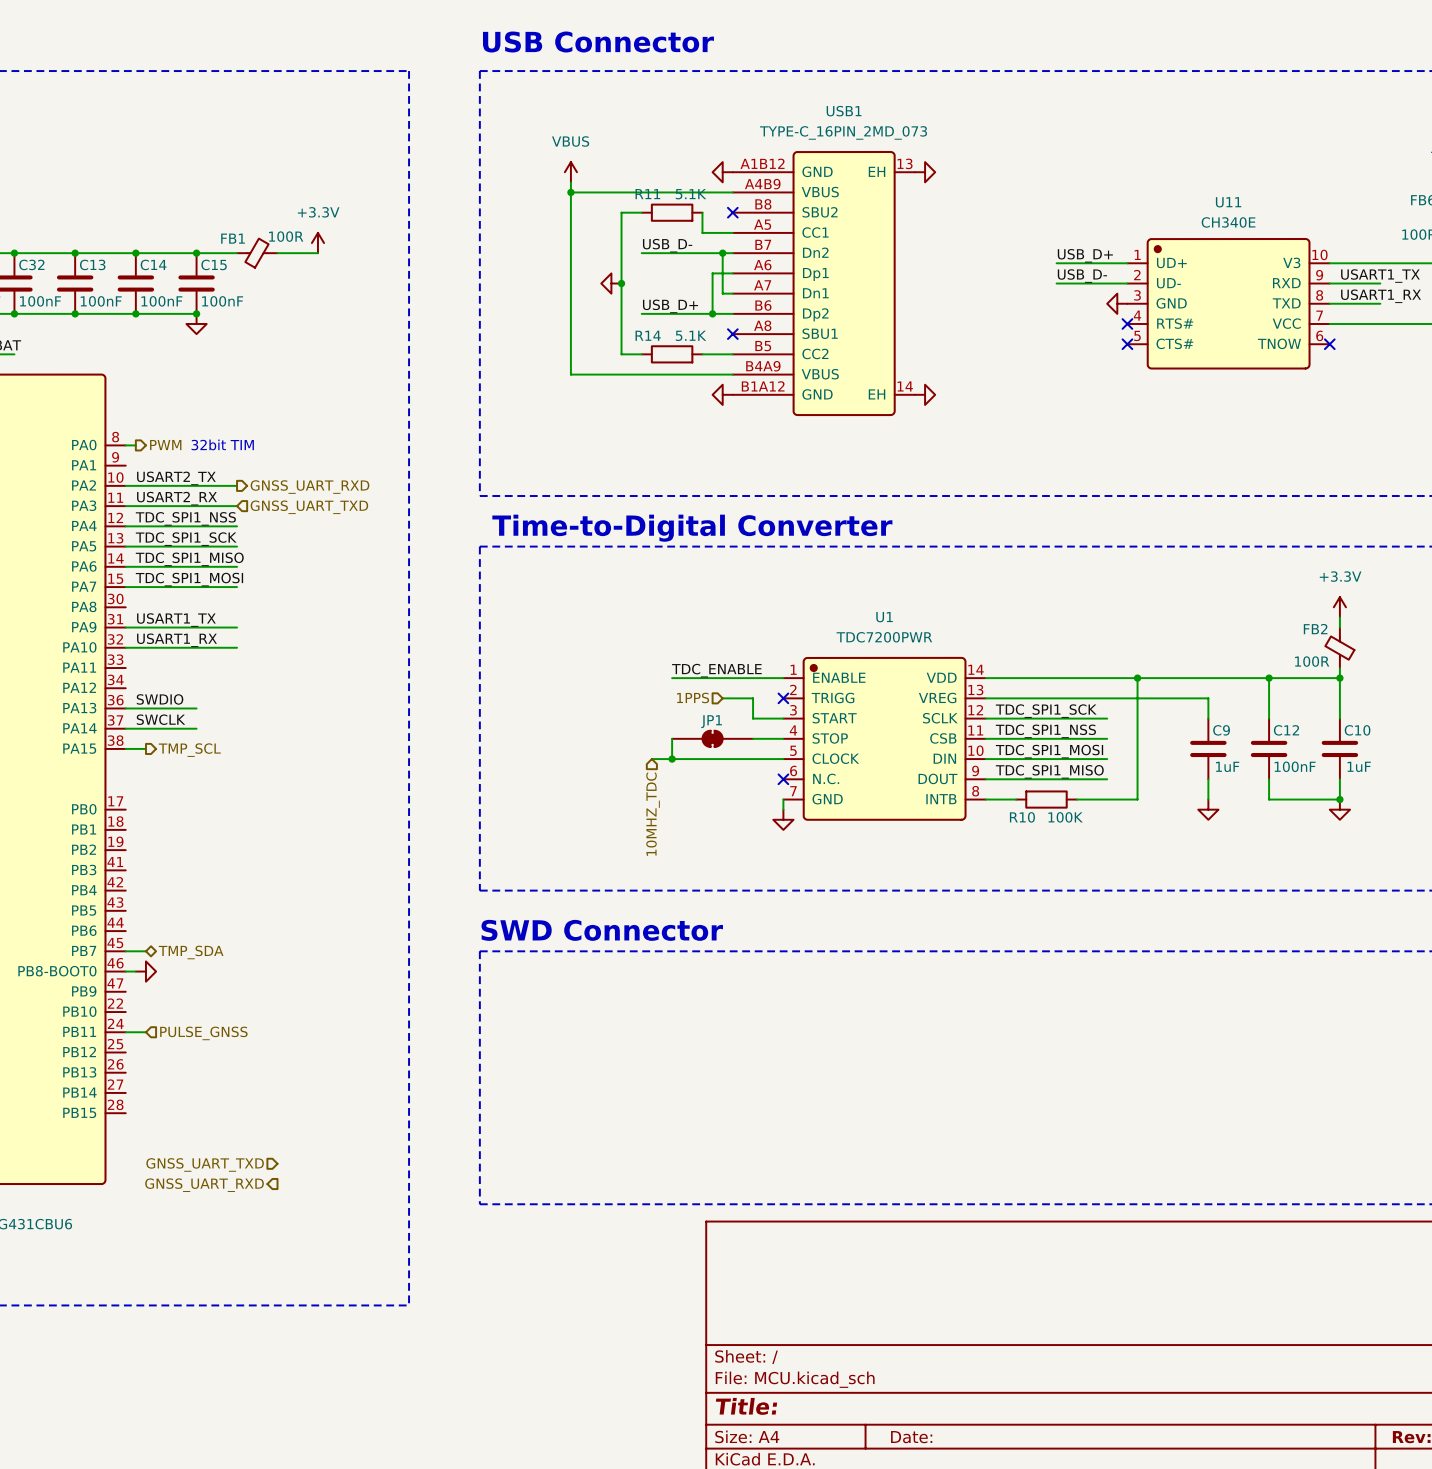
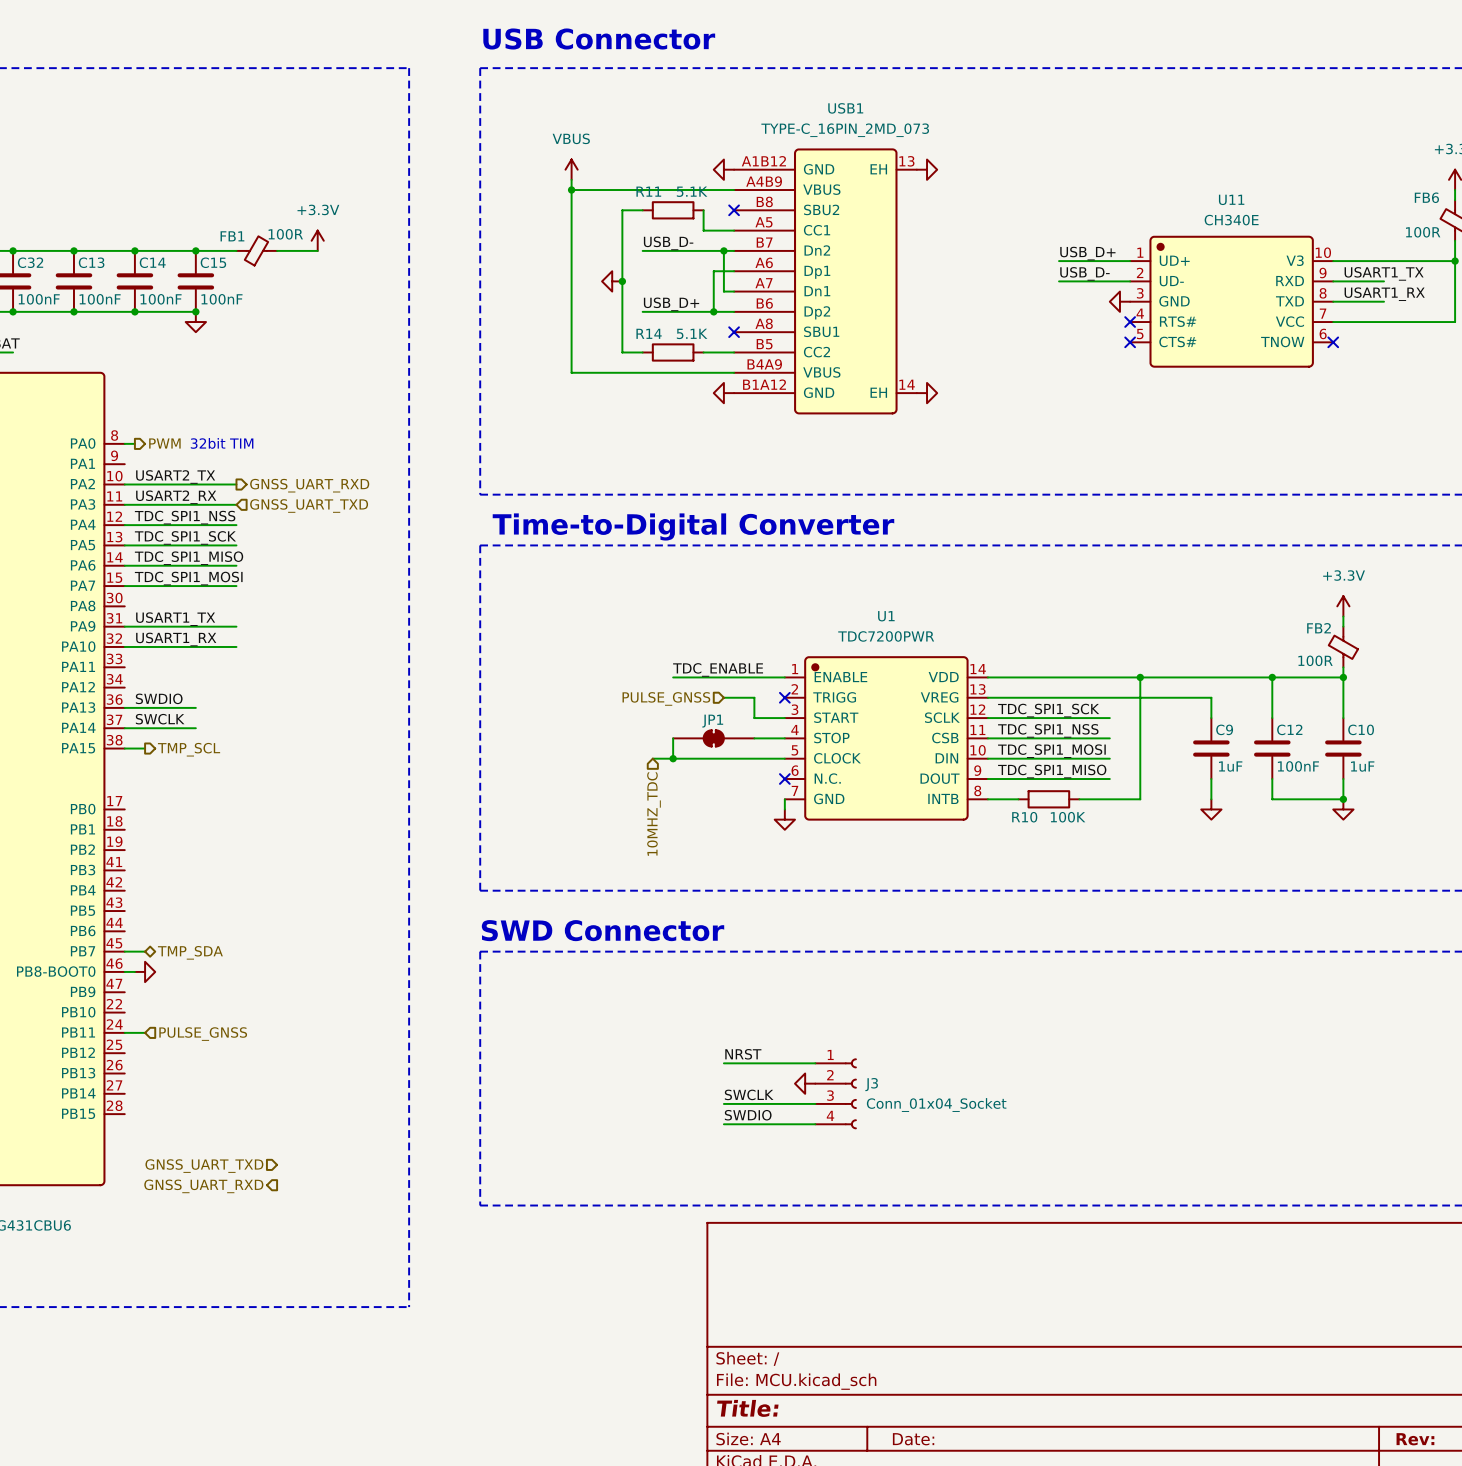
hierarchical label: 1PPS (693, 697) -> PULSE_GNSS (666, 698)
label: none -> NRST (743, 1054)
wire: none -> (723, 1063) (815, 1063)
power symbol: none -> (805, 1083)
J3: none -> Conn_01x04_Socket (835, 1093)
label: none -> SWCLK (749, 1094)
wire: none -> (723, 1103) (815, 1103)
label: none -> SWDIO (748, 1115)
wire: none -> (723, 1124) (815, 1124)

